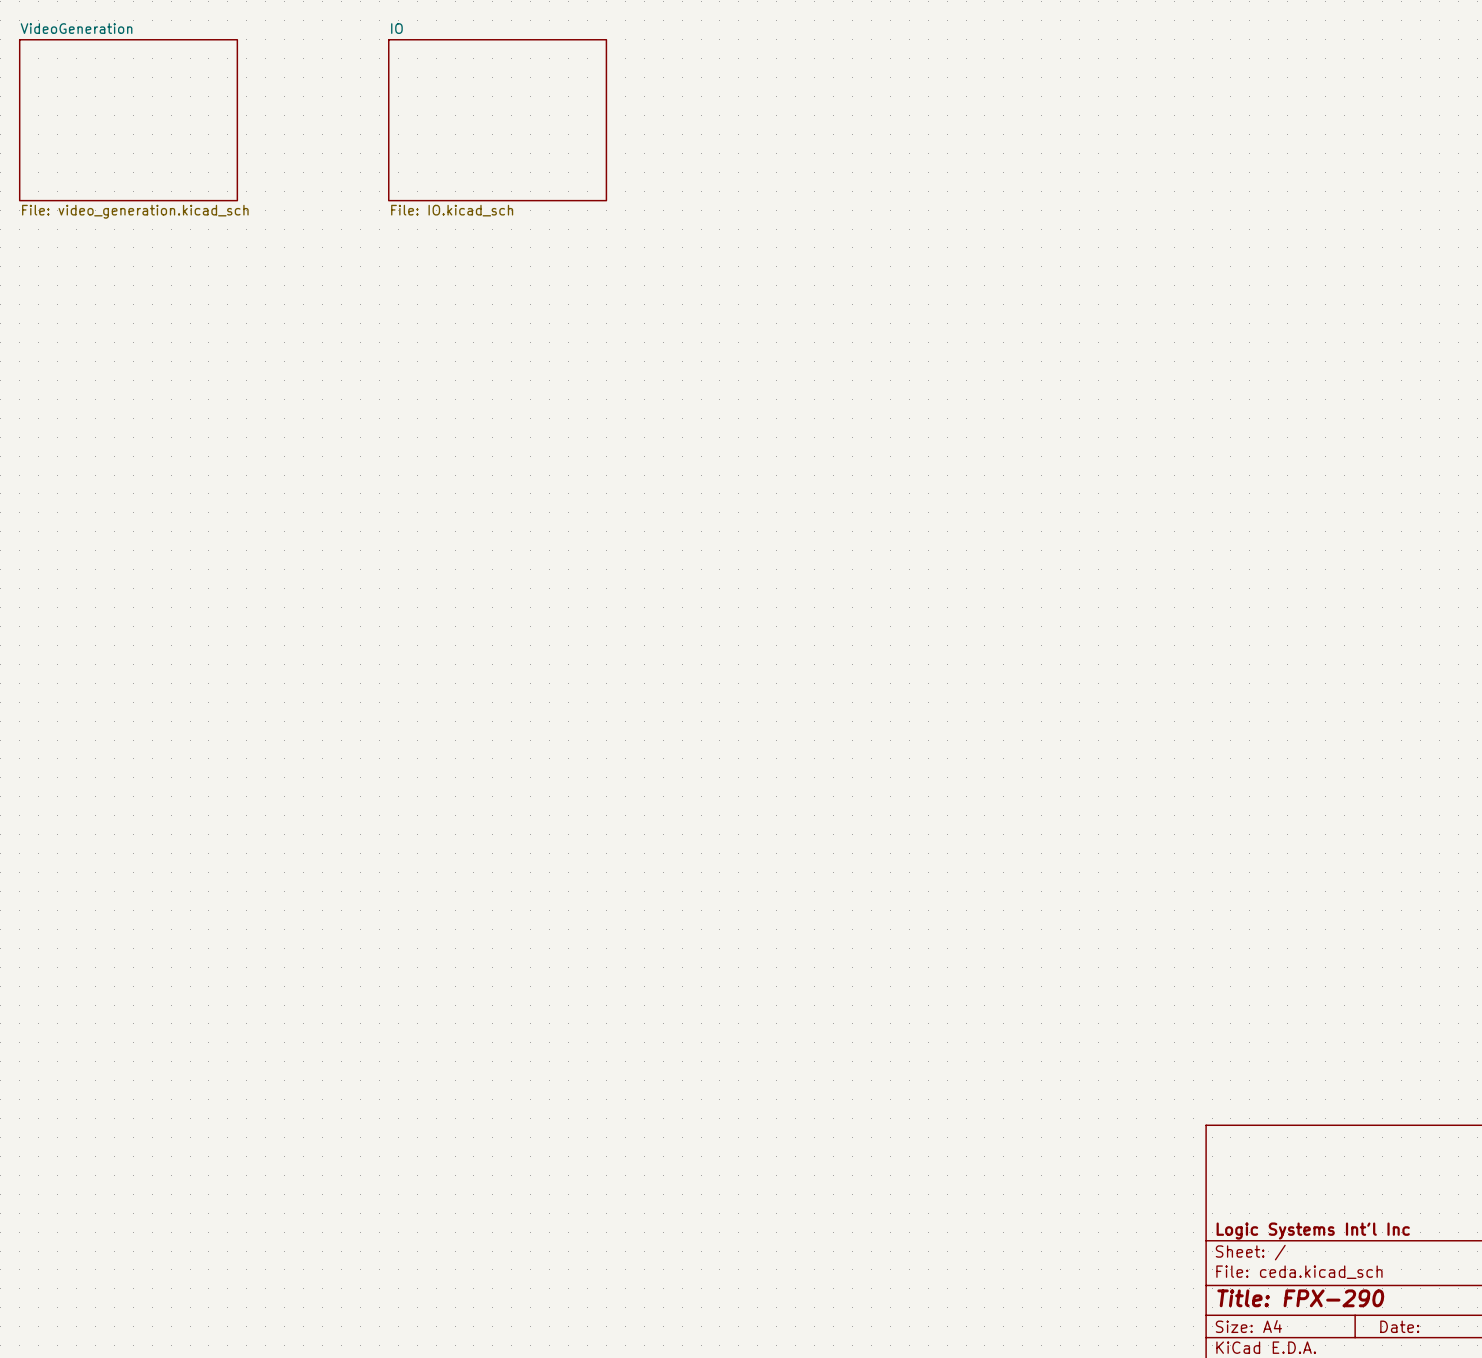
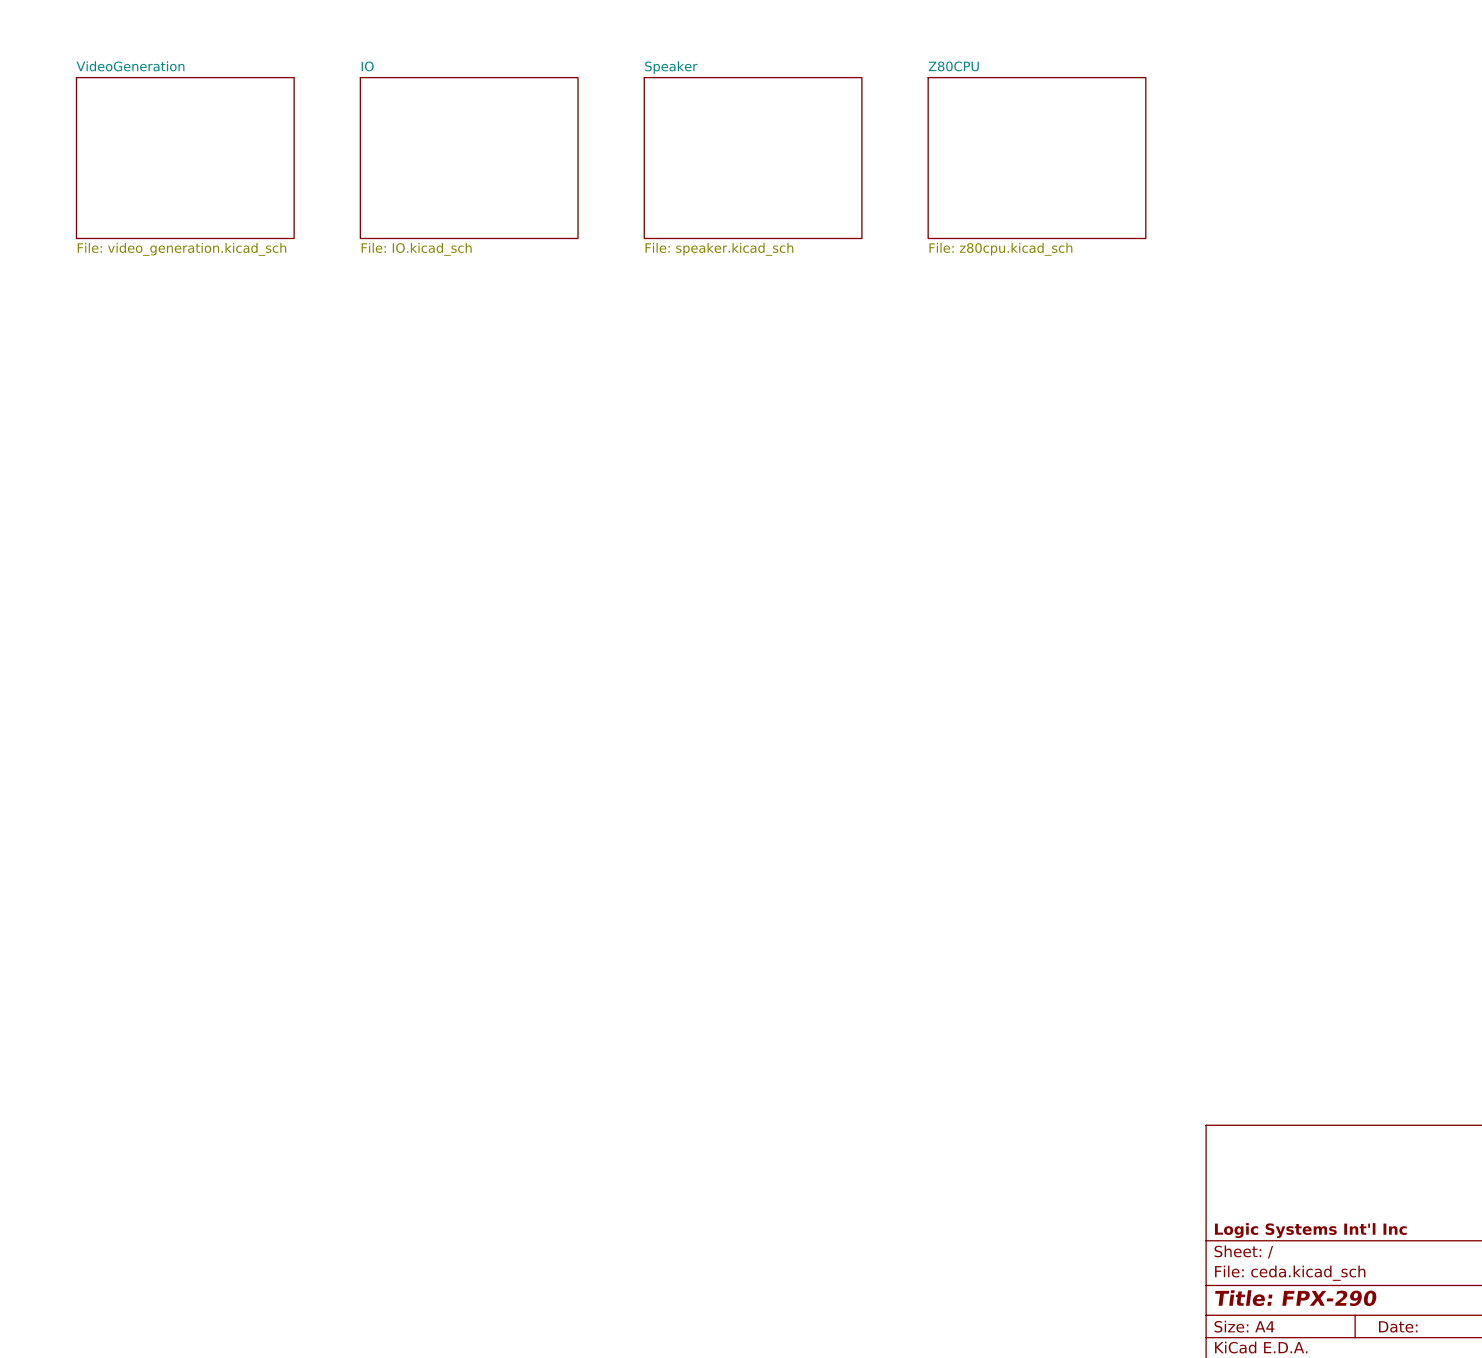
sheet VideoGeneration position: (128, 120) -> (185, 158)
sheet IO position: (497, 120) -> (469, 158)
sheet Speaker: none -> File: speaker.kicad_sch (753, 158)
sheet Z80CPU: none -> File: z80cpu.kicad_sch (1036, 158)

